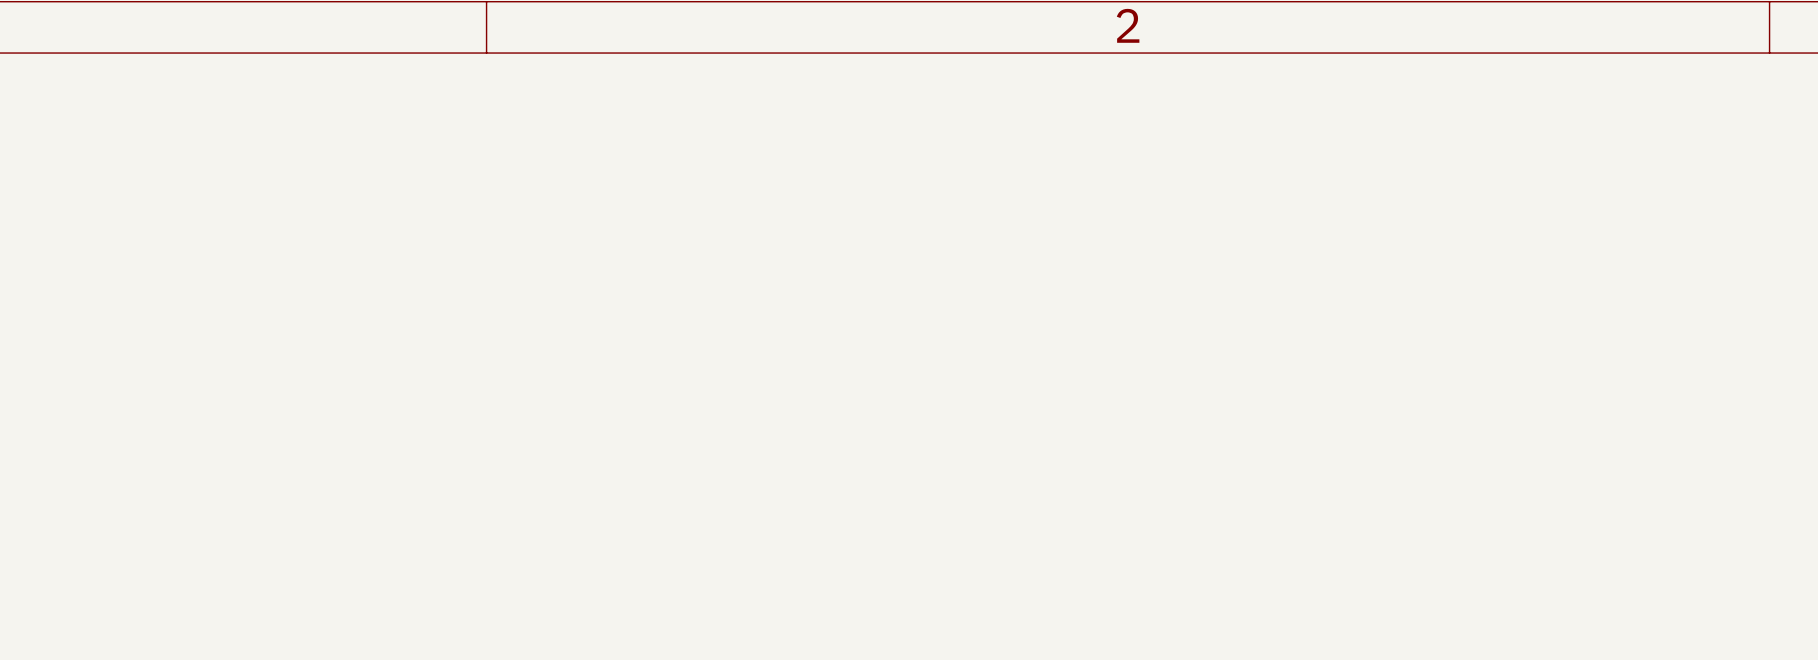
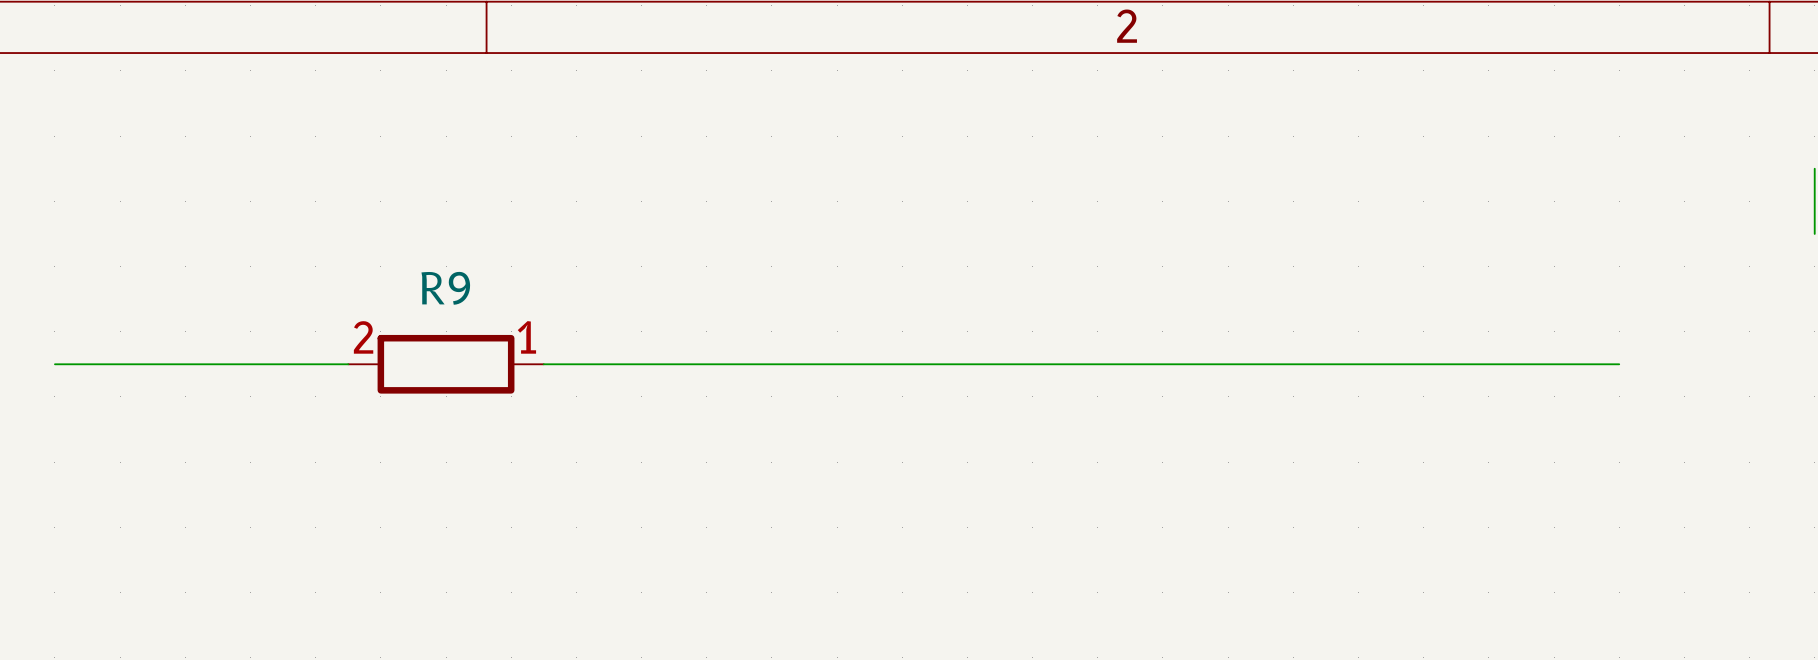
wire: none -> (1814, 168) (1814, 233)
wire: none -> (54, 364) (348, 364)
R9: none -> (446, 364)
wire: none -> (543, 364) (1619, 364)

